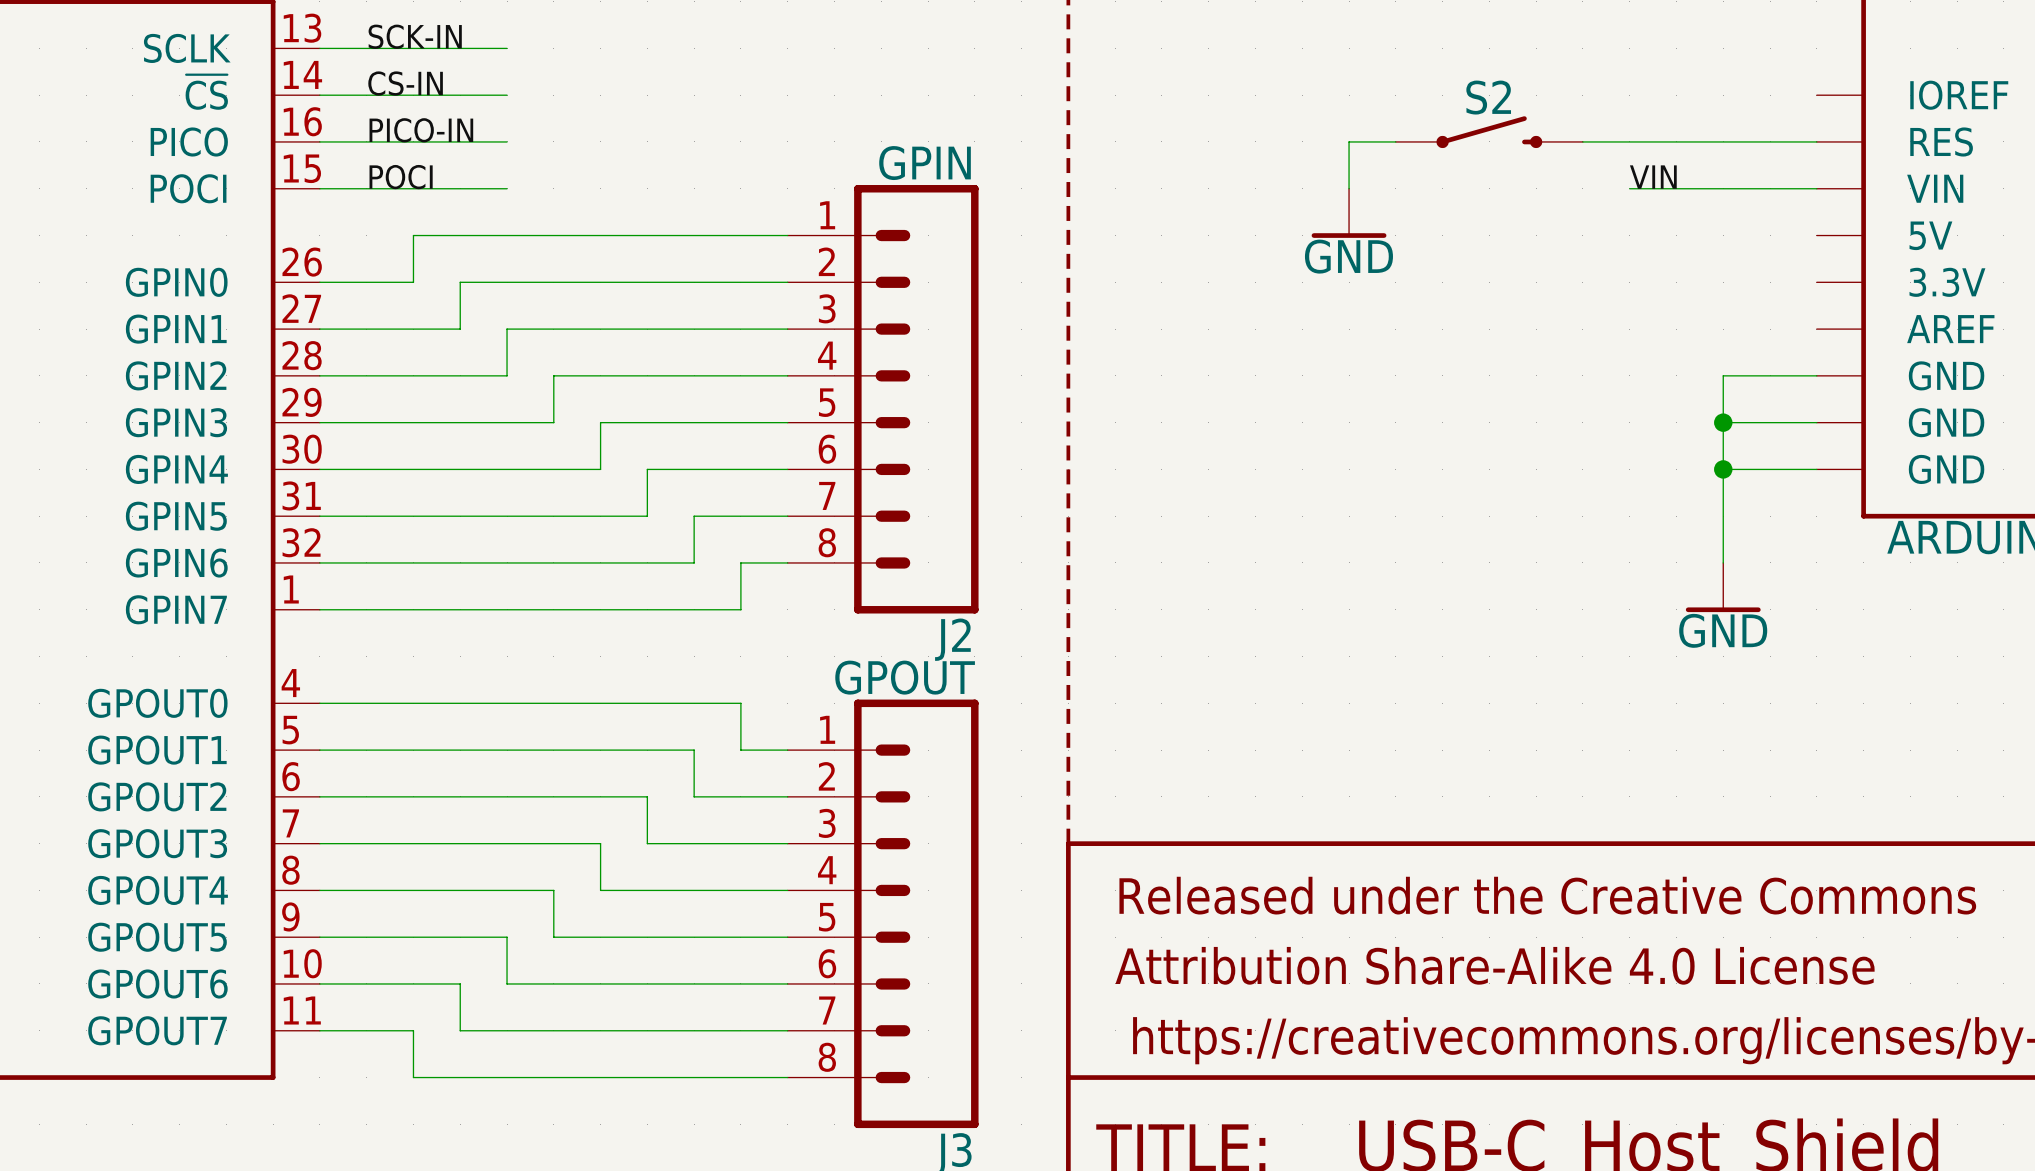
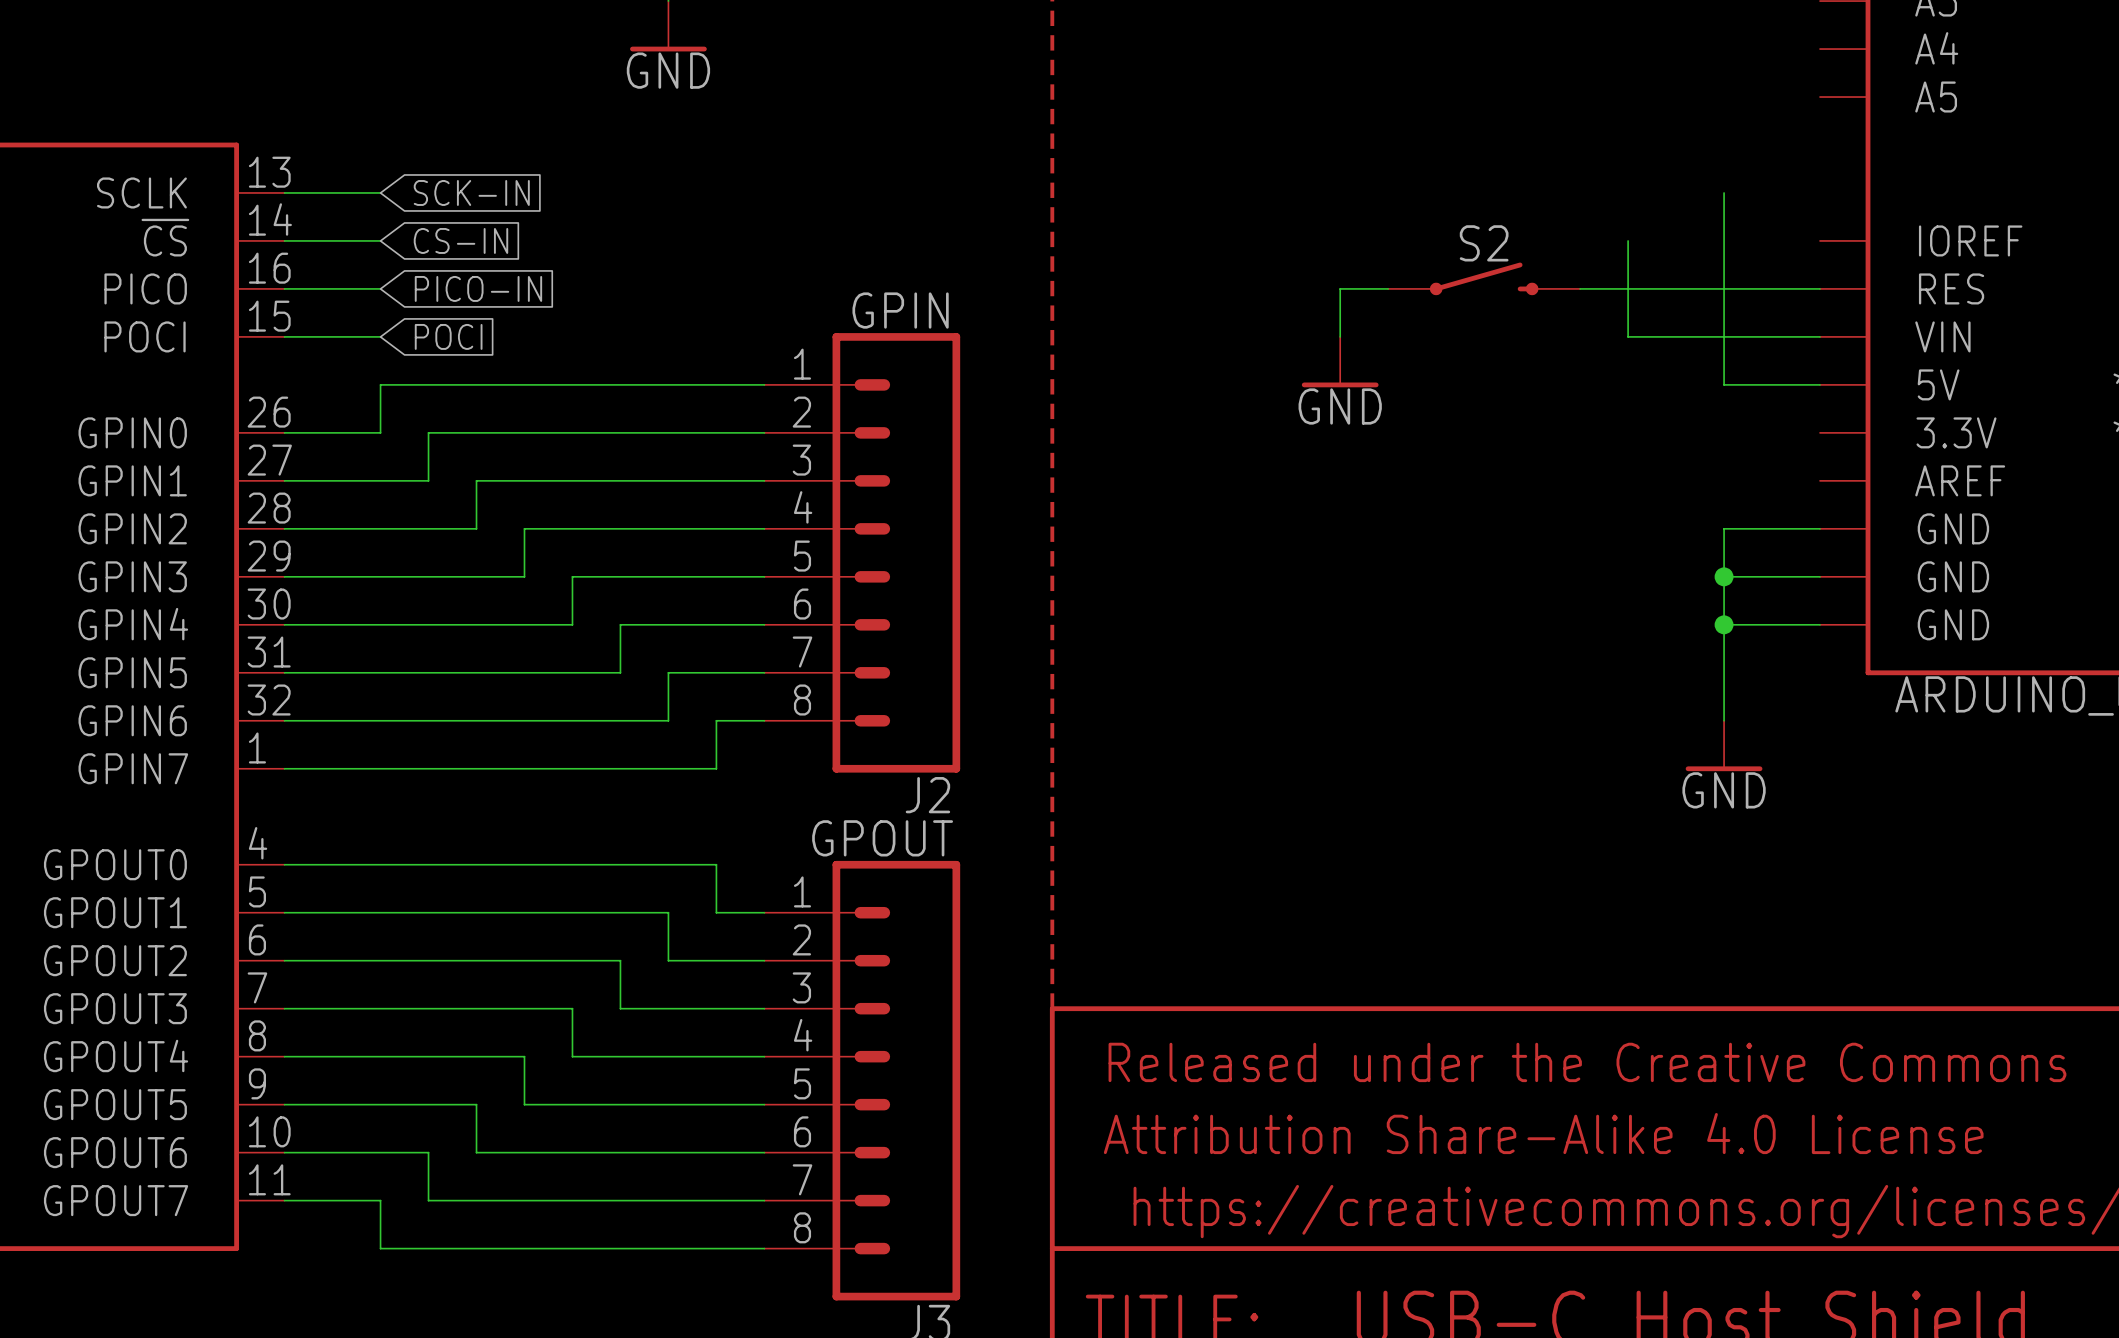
label: SCK-IN (415, 36) -> none
wire: (413, 48) (507, 48) -> none
global label: none -> SCK-IN (471, 192)
wire: none -> (1724, 192) (1724, 384) (1820, 384)
label: CS-IN (405, 83) -> none
wire: (413, 95) (507, 95) -> none
global label: none -> CS-IN (460, 240)
wire: none -> (1628, 240) (1628, 336)
label: PICO-IN (421, 130) -> none
wire: (413, 141) (507, 141) -> none
global label: none -> PICO-IN (478, 288)
label: POCI (401, 177) -> none
label: VIN (1653, 177) -> none
wire: (413, 188) (507, 188) -> none
global label: none -> POCI (448, 336)

